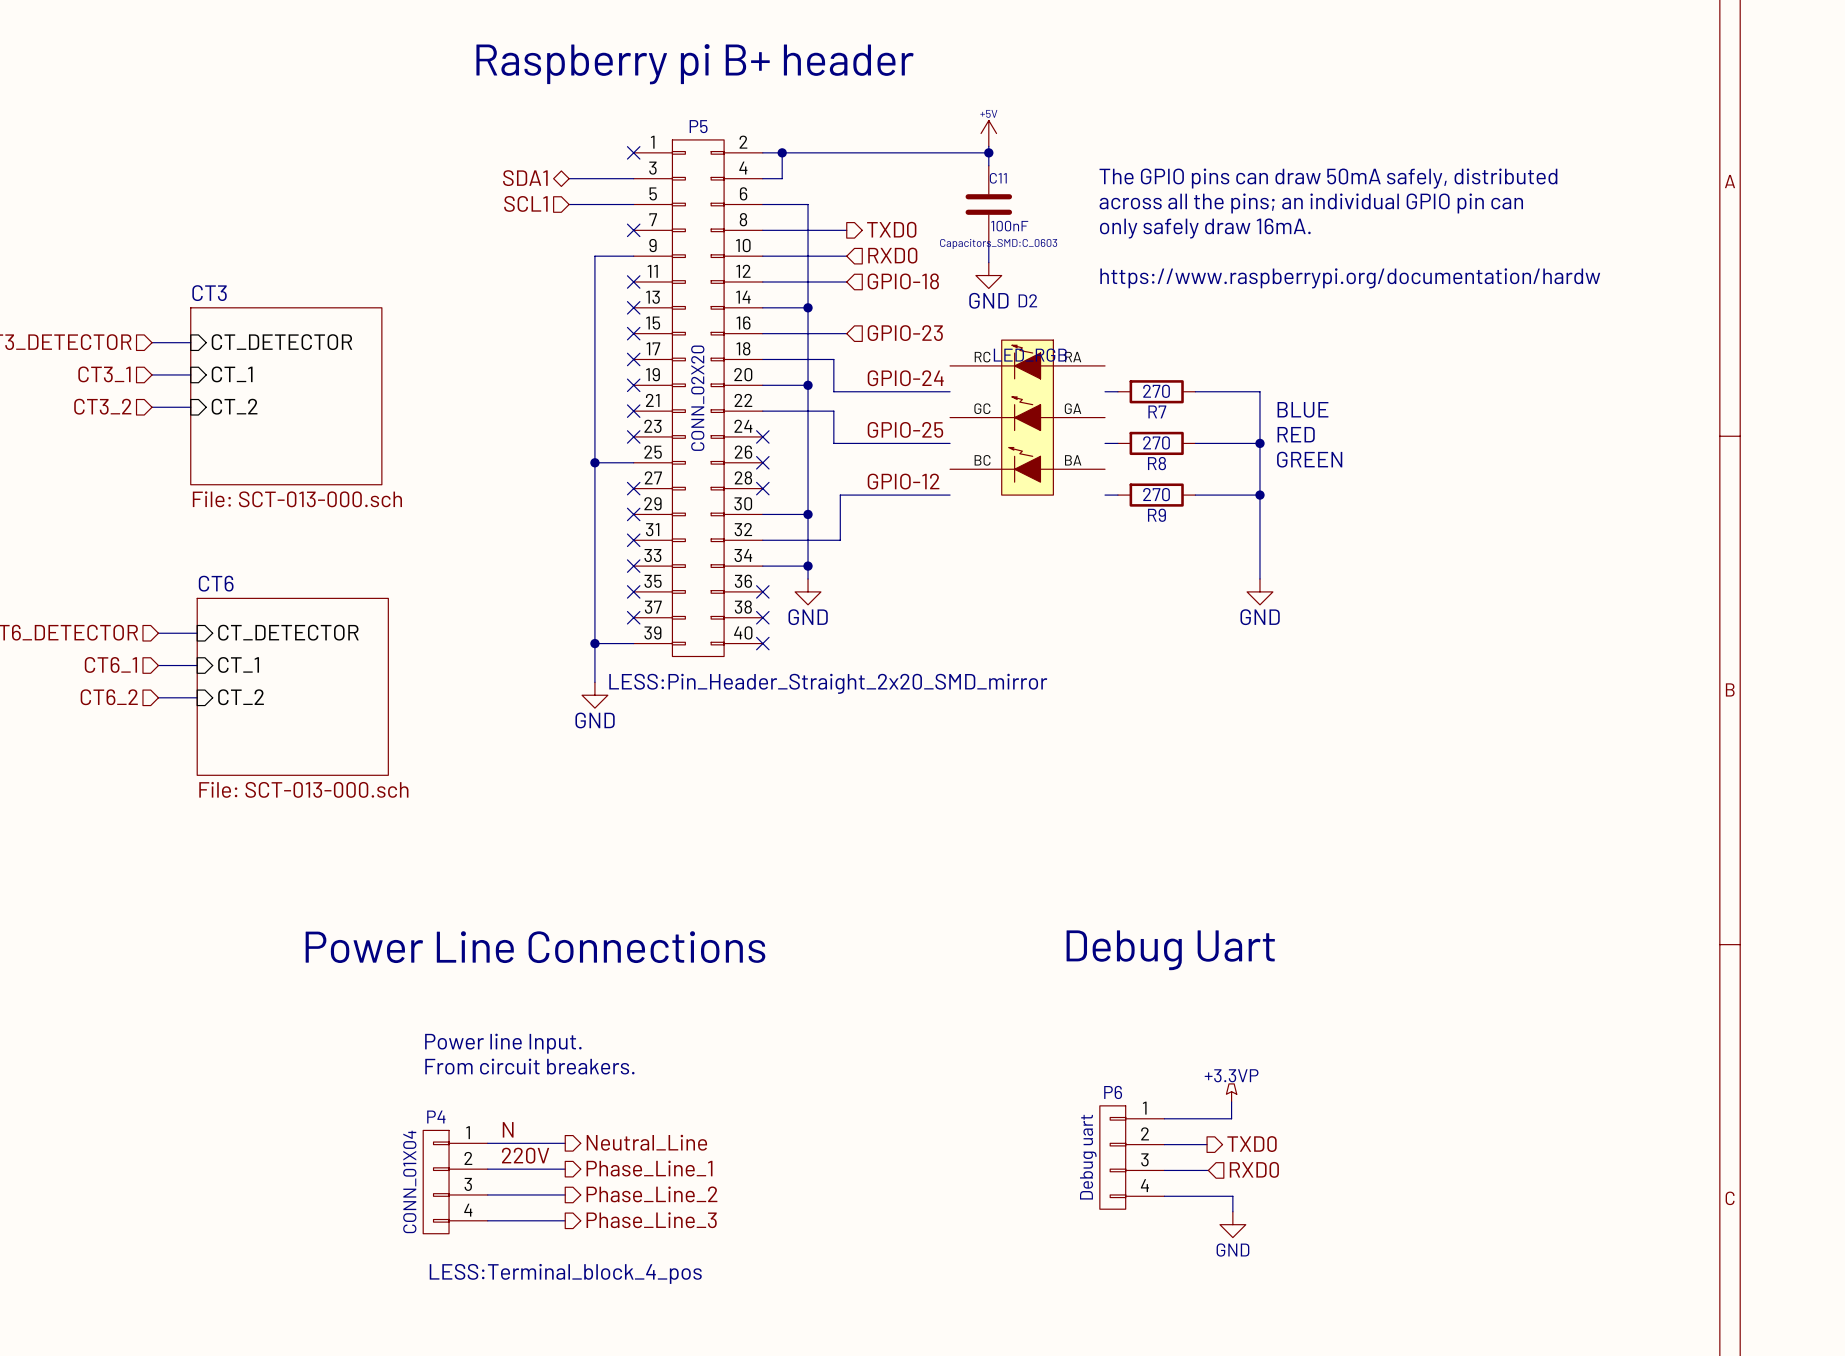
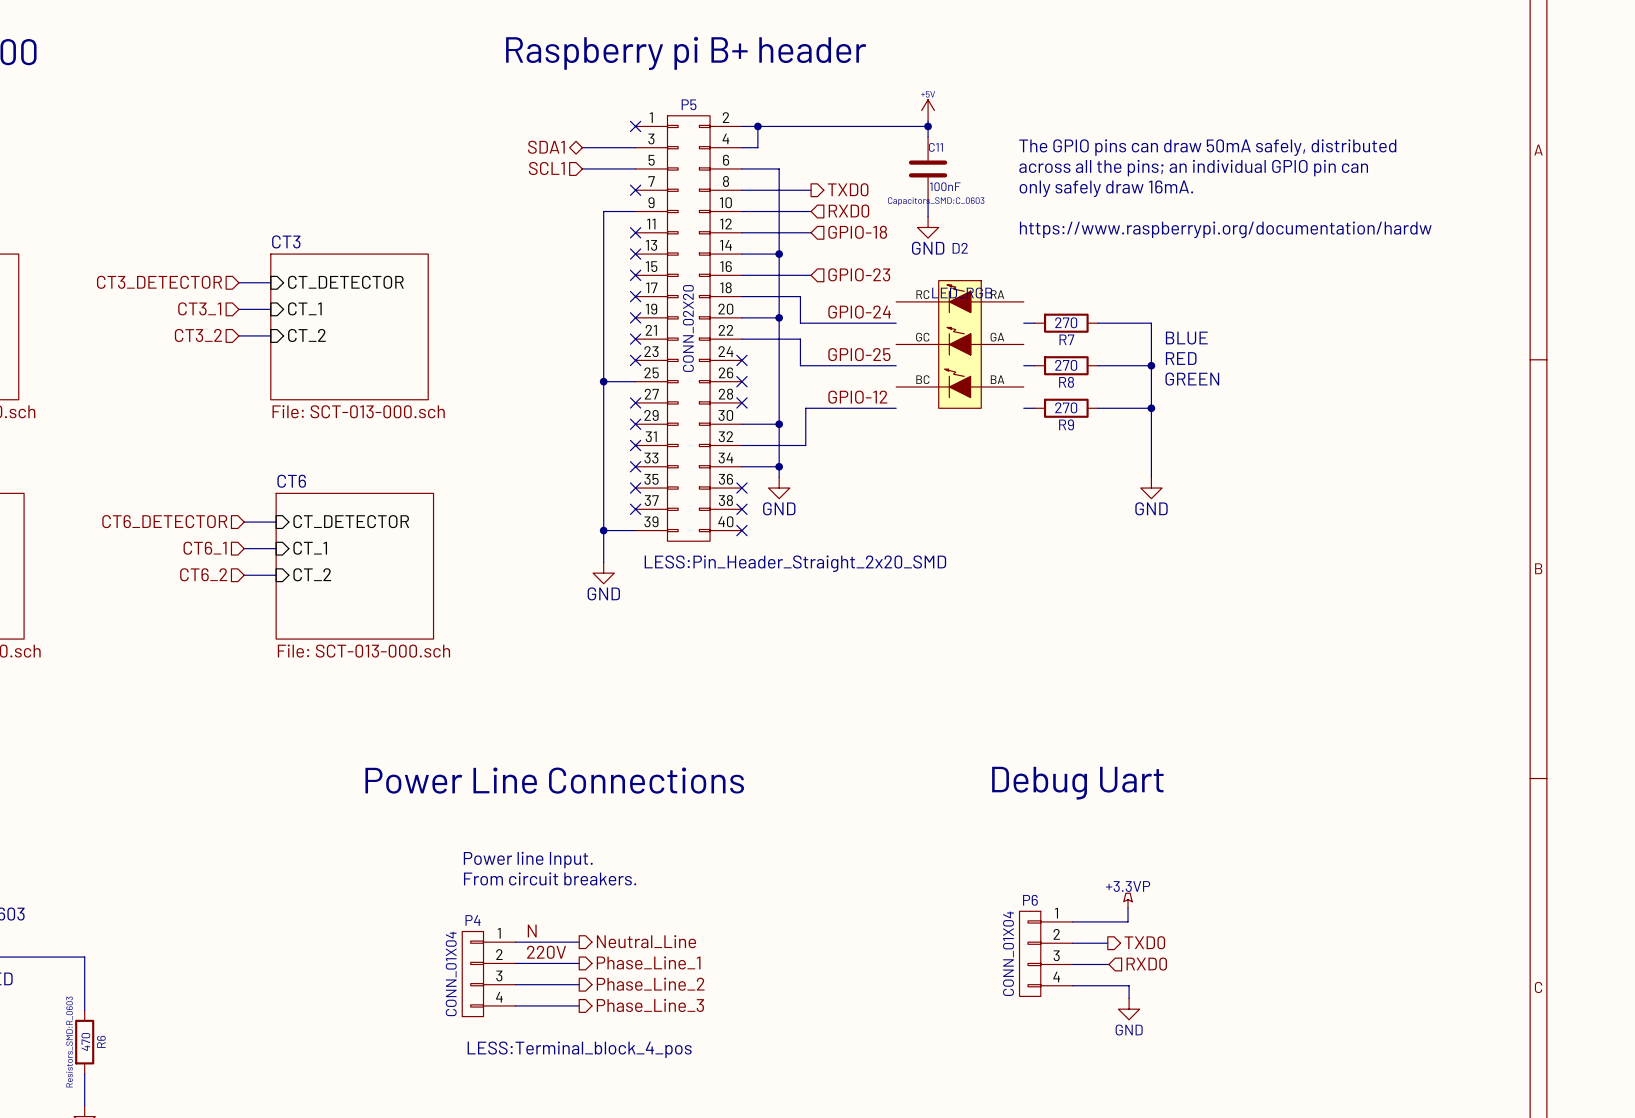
P5 text: LESS:Pin_Header_Straight_2x20_SMD_mirror (828, 683) -> LESS:Pin_Header_Straight_2x20_SMD (795, 563)
P6 value: Debug uart (1088, 1157) -> CONN_01X04 (1008, 953)

